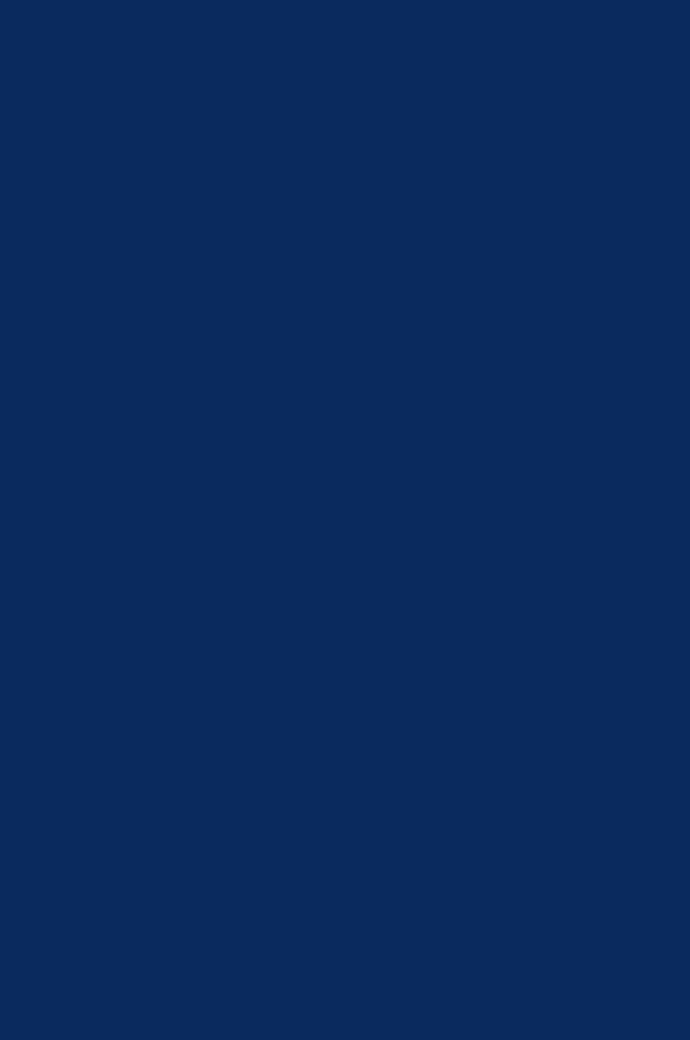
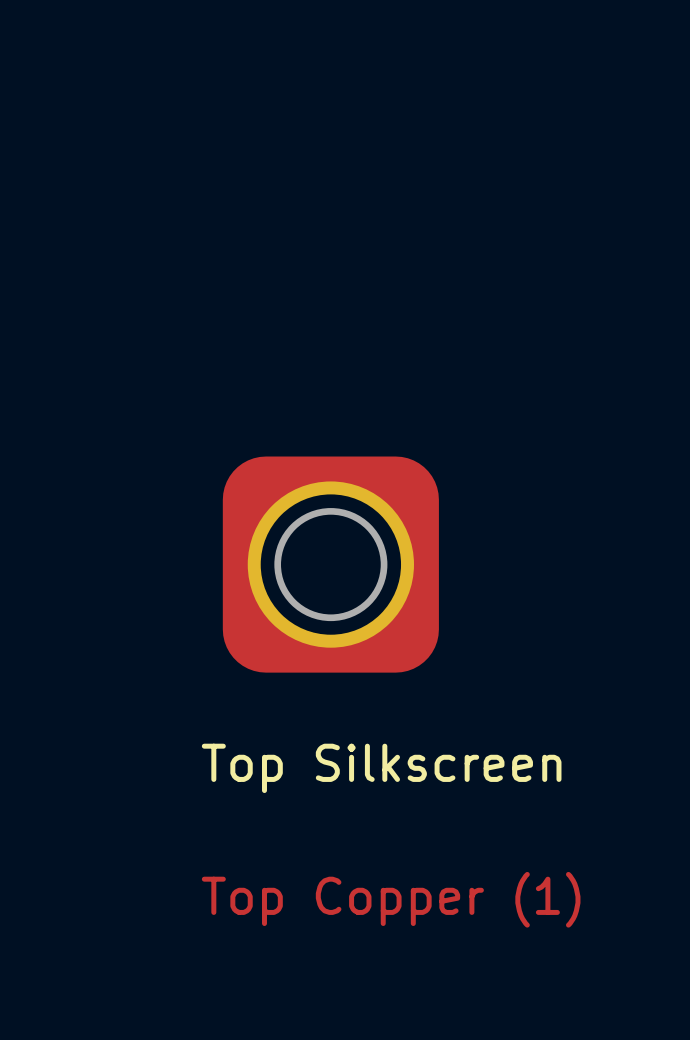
drawing: none -> [274, 508, 388, 622]
part: none -> (330, 564)
text: none -> Top Silkscreen (381, 768)
text: none -> Top Copper (1) (391, 899)

